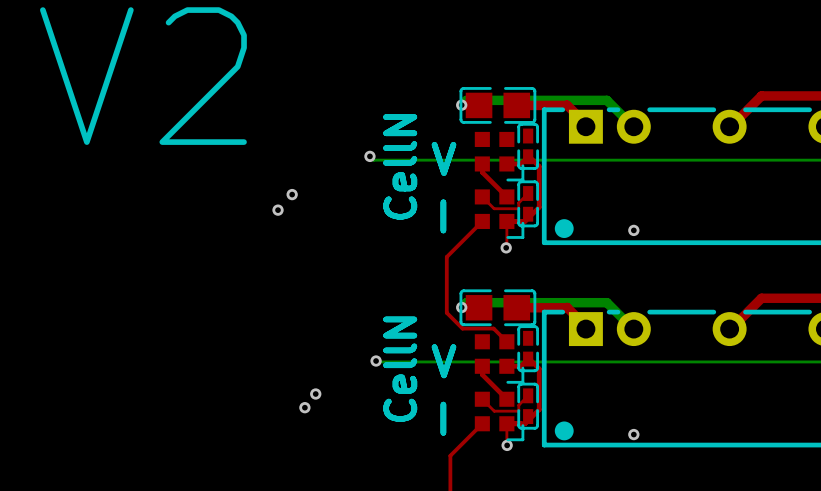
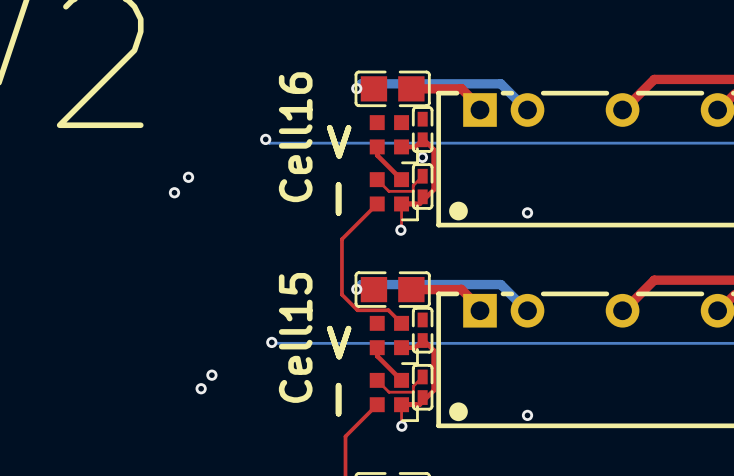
text: CellN (400, 166) -> Cell16 (295, 137)
via: none -> (422, 157)
text: CellN (400, 369) -> Cell15 (295, 337)

